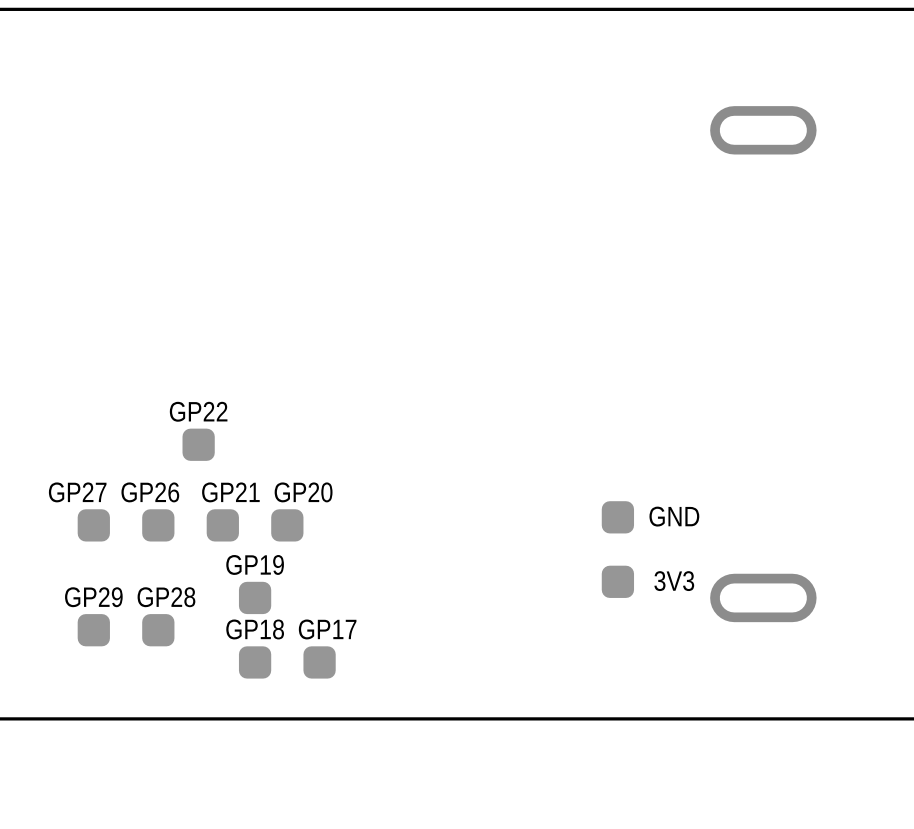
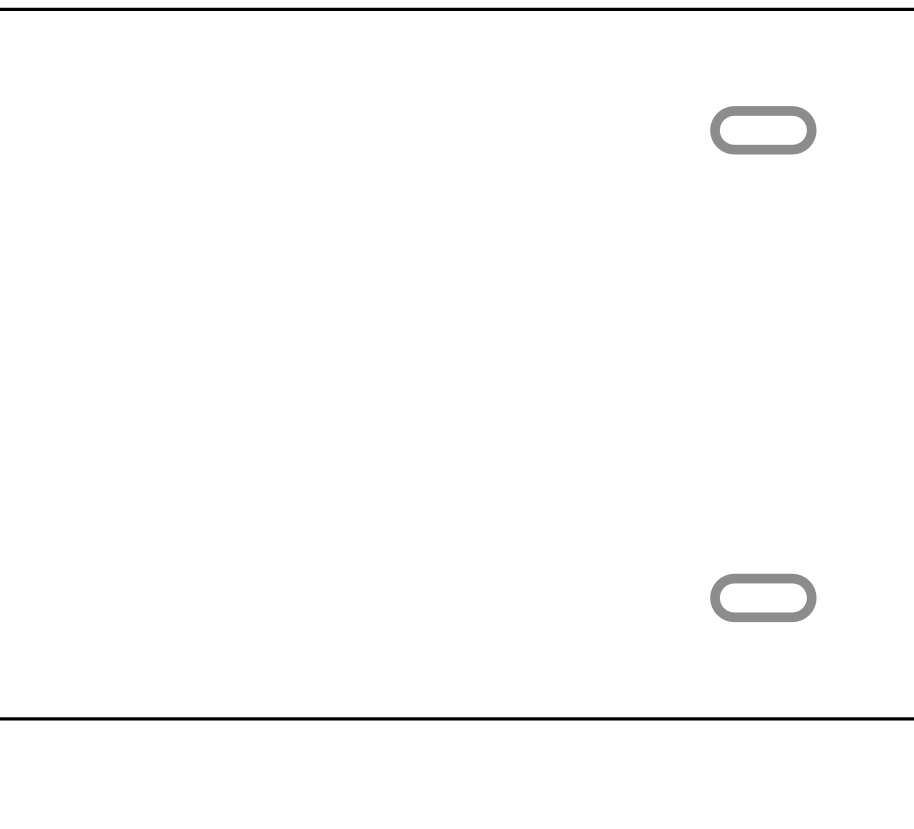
part: (198, 444) -> none
part: (617, 517) -> none
part: (93, 525) -> none
part: (158, 525) -> none
part: (222, 525) -> none
part: (287, 525) -> none
part: (617, 581) -> none
part: (255, 597) -> none
part: (93, 630) -> none
part: (158, 630) -> none
part: (255, 662) -> none
part: (319, 662) -> none

